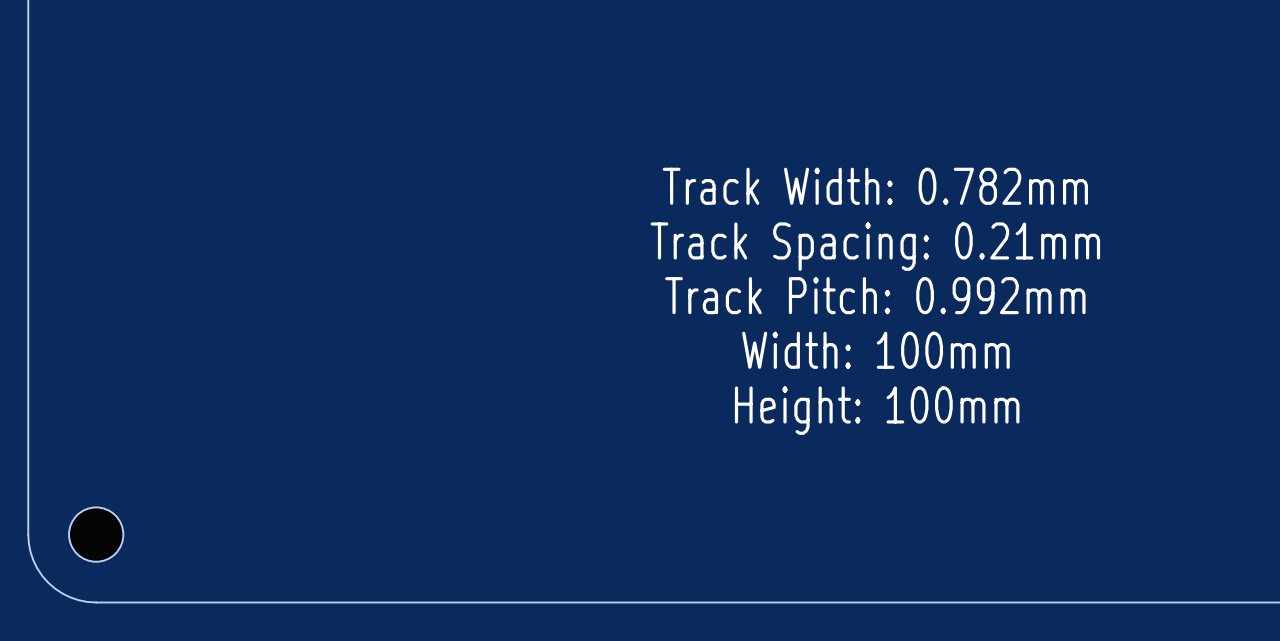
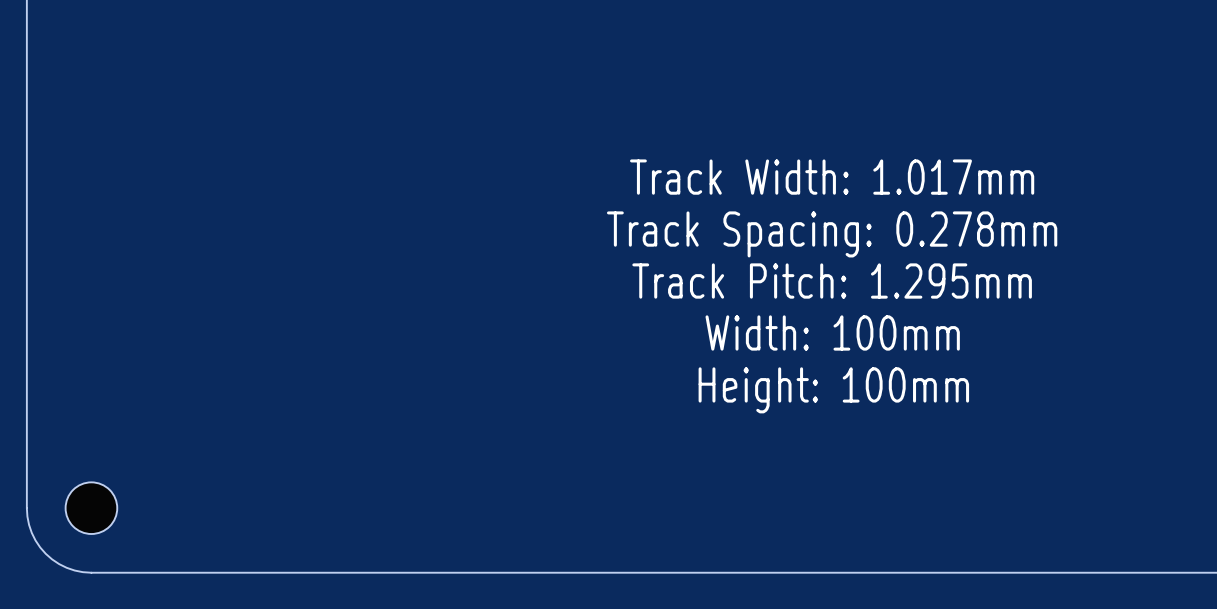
text: Track Width: 0.782mm (875, 186) -> Track Width: 1.017mm (832, 177)
text: Track Spacing: 0.21mm (875, 246) -> Track Spacing: 0.278mm (832, 234)
text: Track Pitch: 0.992mm (875, 295) -> Track Pitch: 1.295mm (832, 281)

